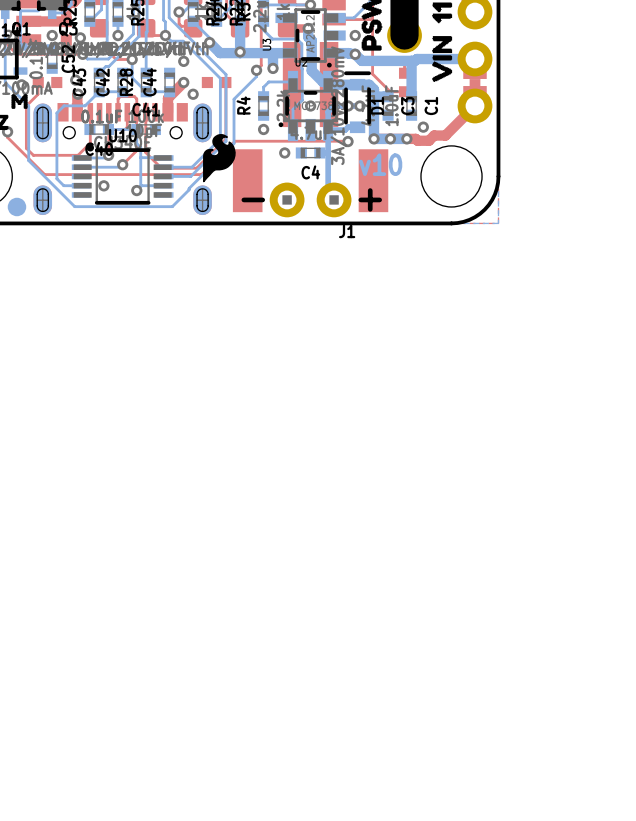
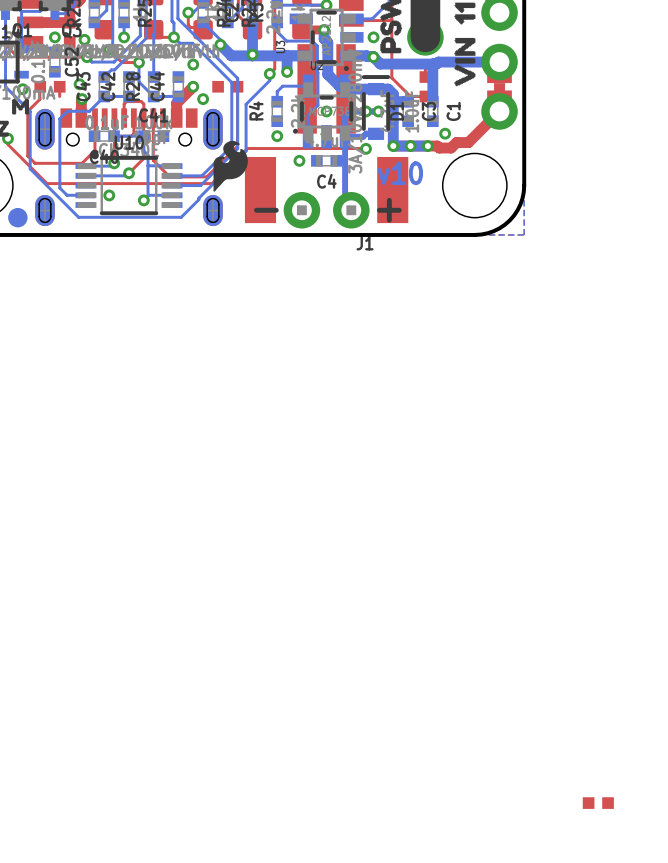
top track: none -> (59, 86) (59, 96)
part: none -> (598, 803)

